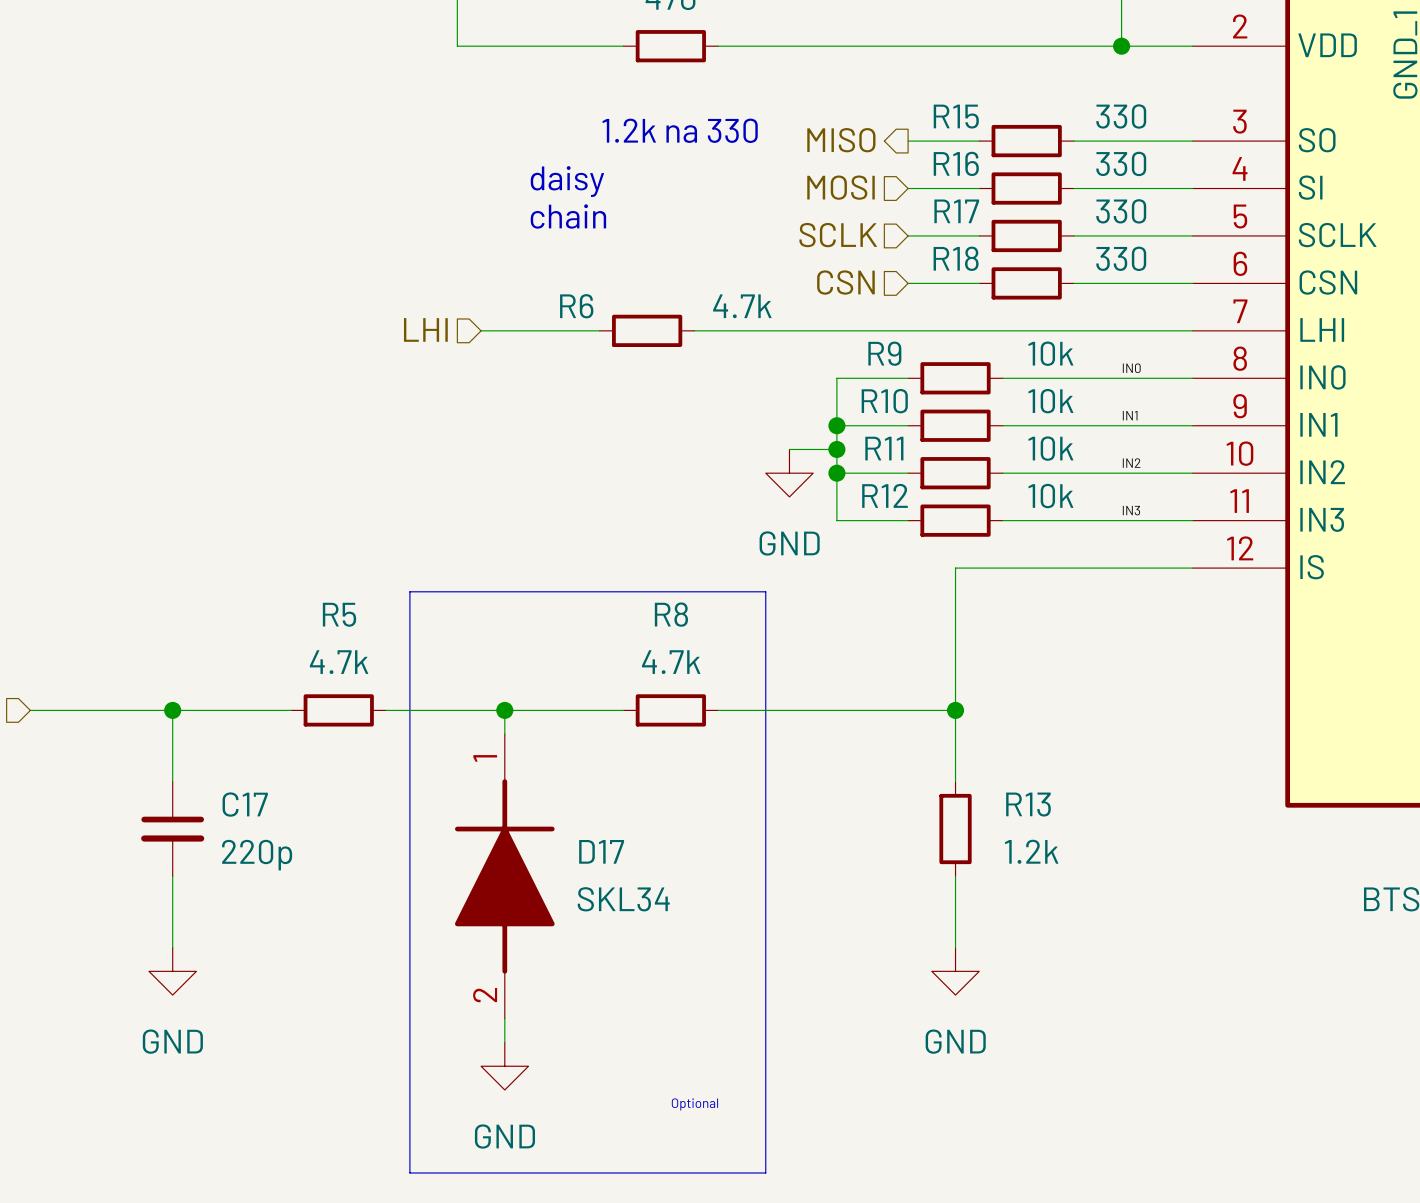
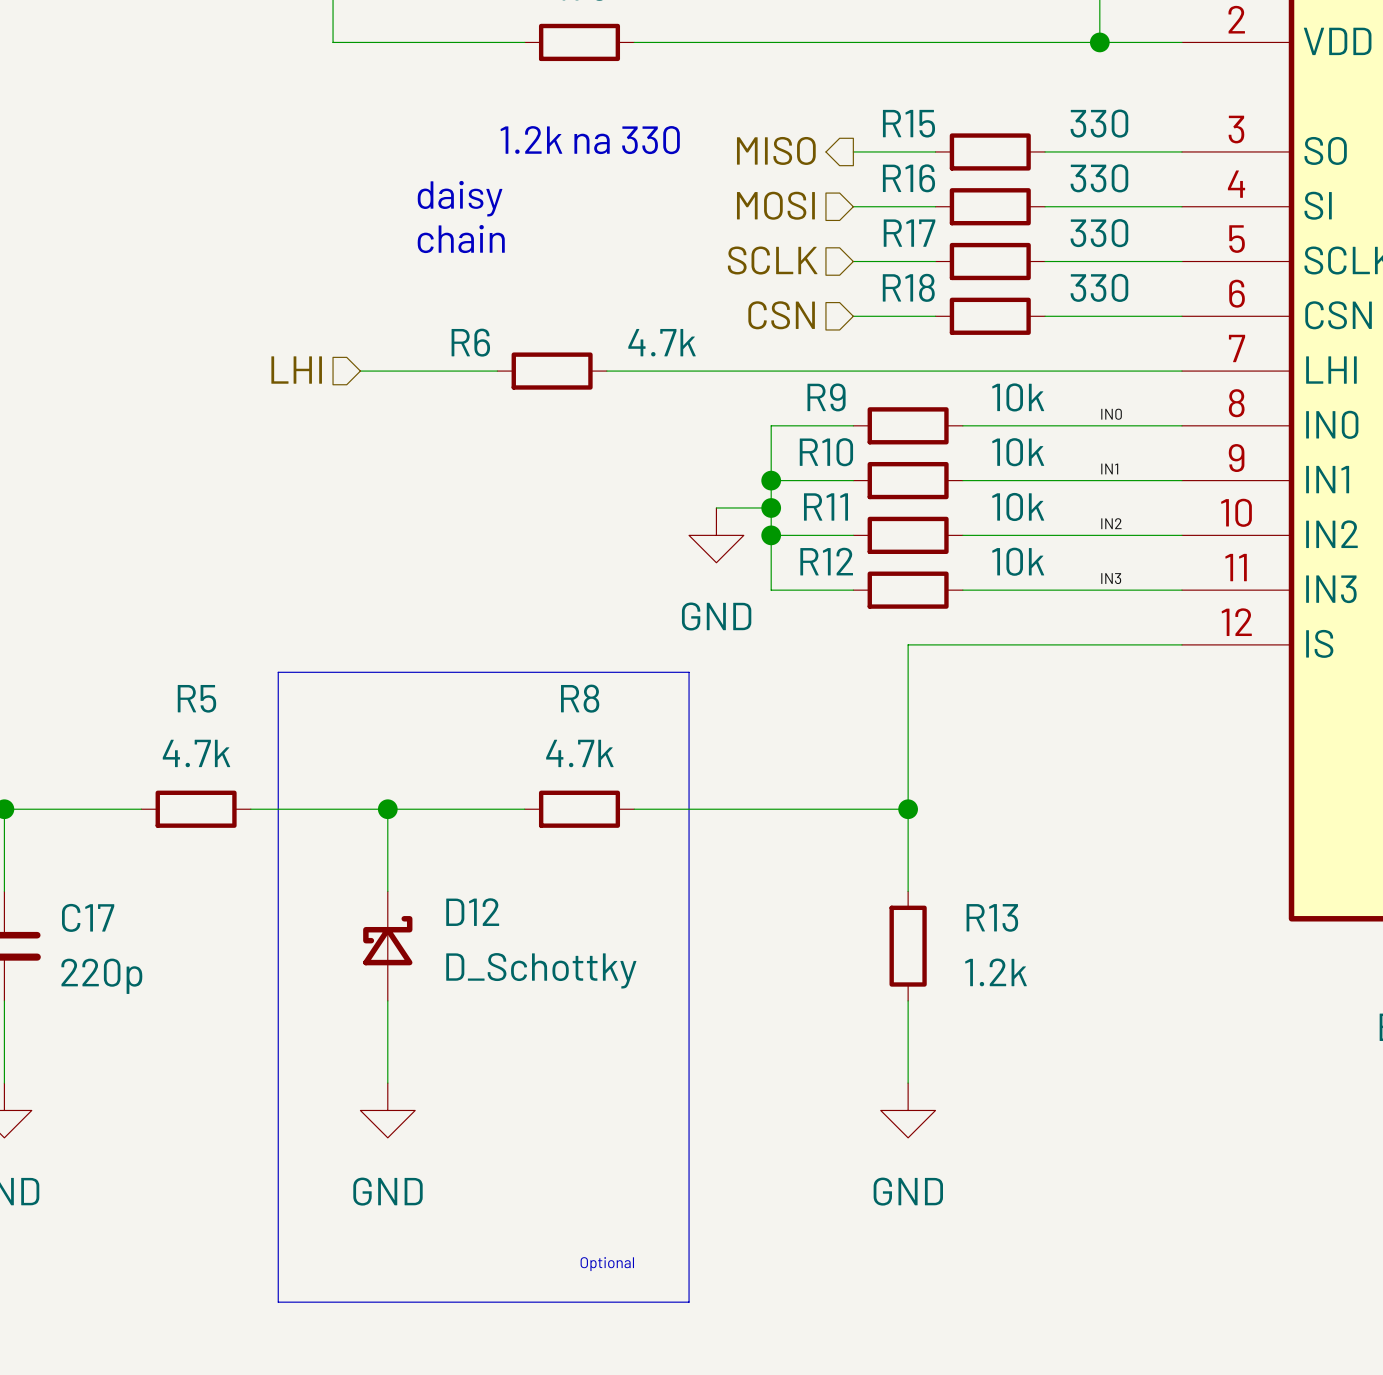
D12: none -> D_Schottky (387, 946)
D17: SKL34 (504, 876) -> none
wire: (504, 1018) (504, 1042) -> none
power symbol position: GND (504, 1066) -> GND (387, 1110)
line: (409, 1137) (409, 1172) (765, 1172) (765, 1137) -> (278, 1302) (689, 1302)

